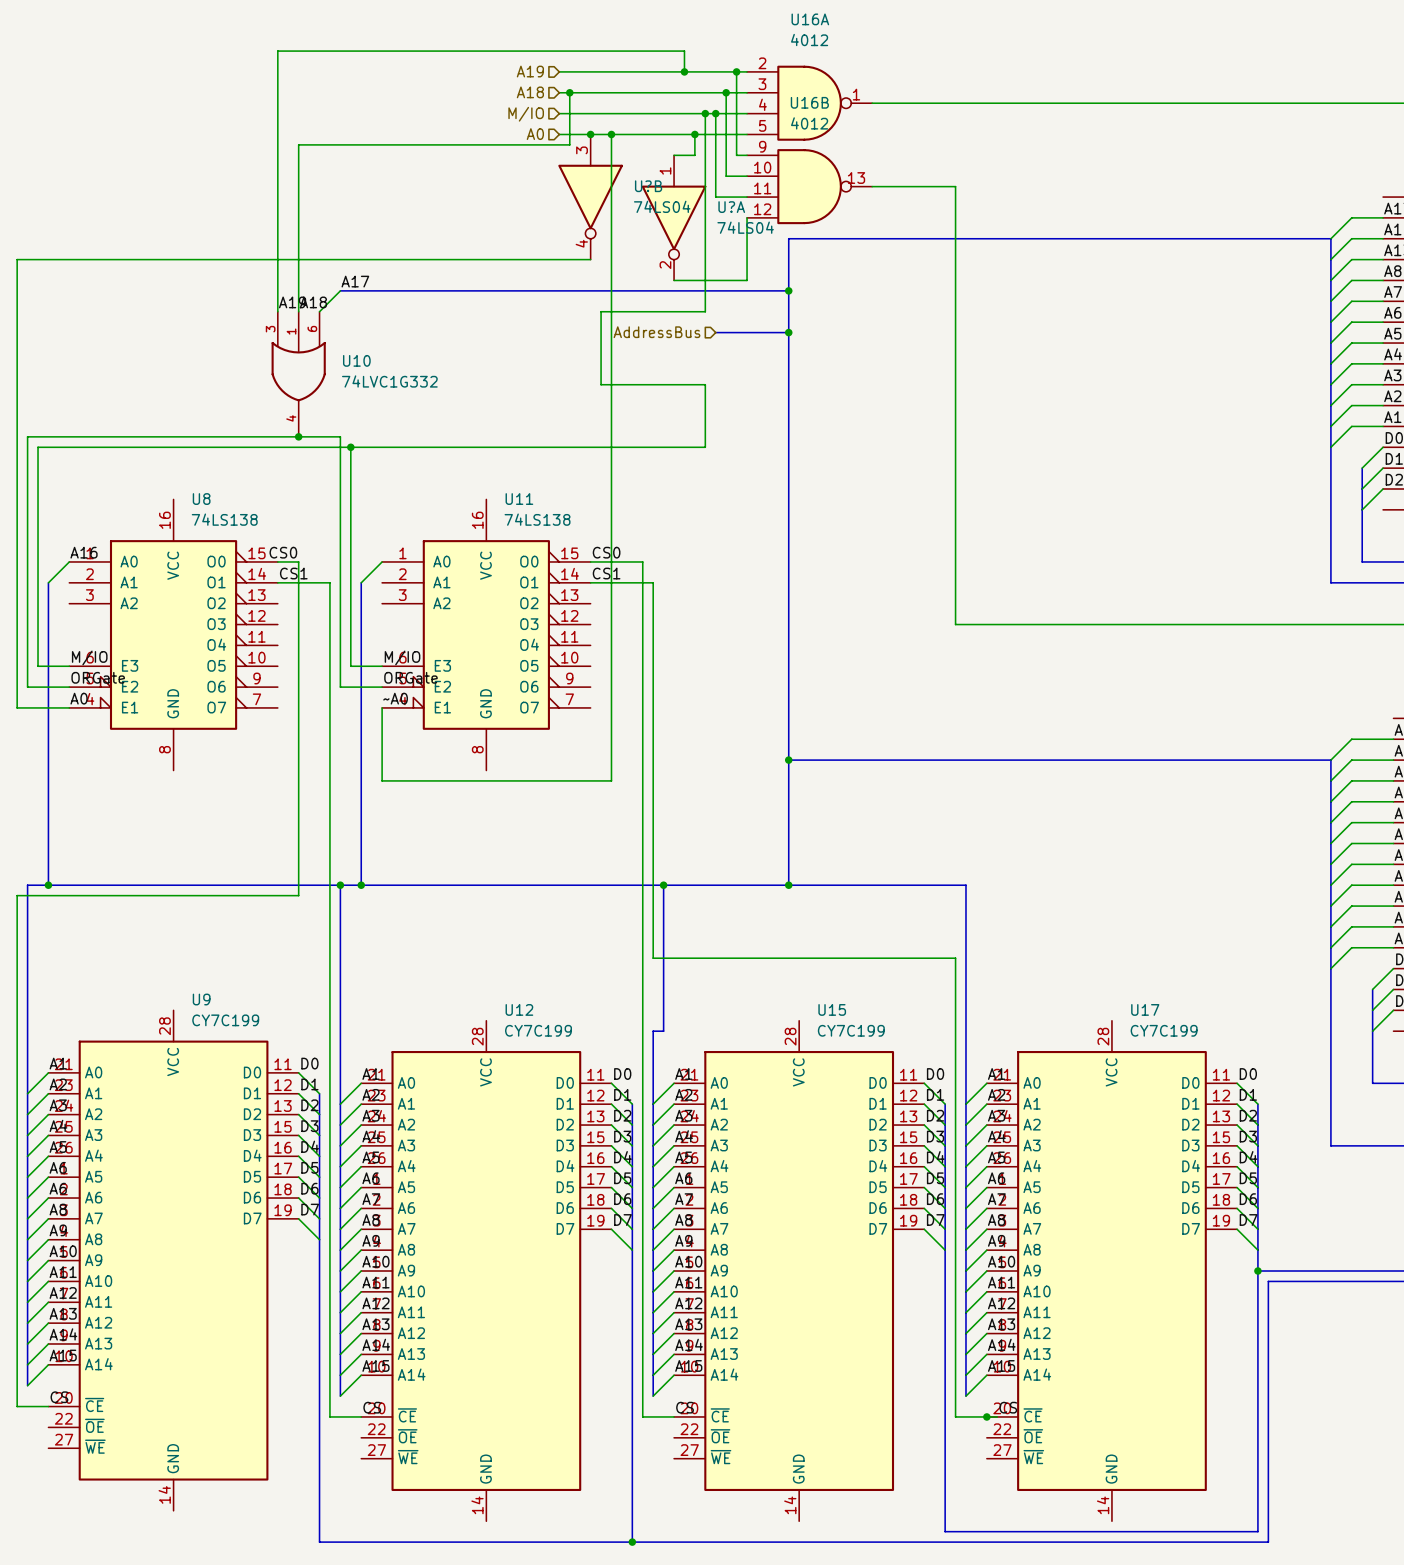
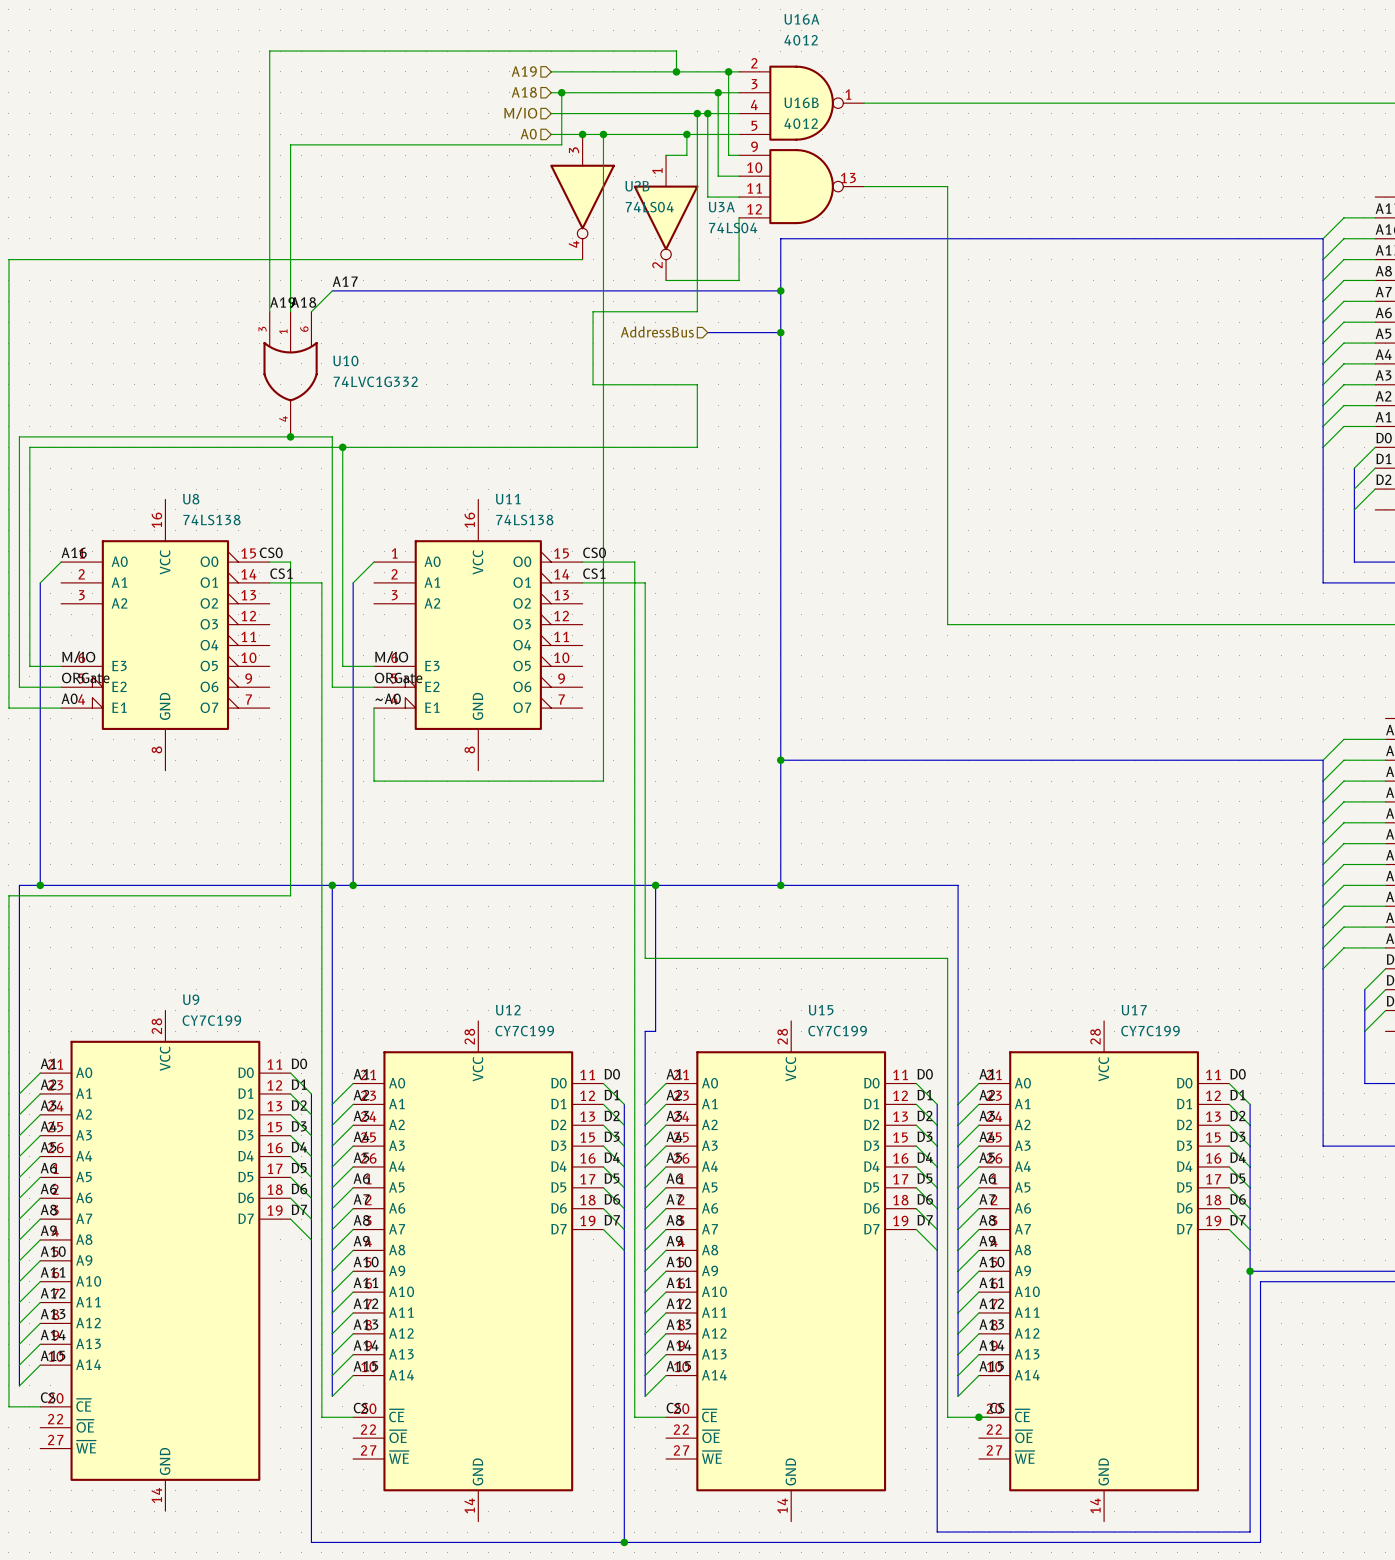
U?A name: U?A (731, 207) -> U3A (721, 207)

